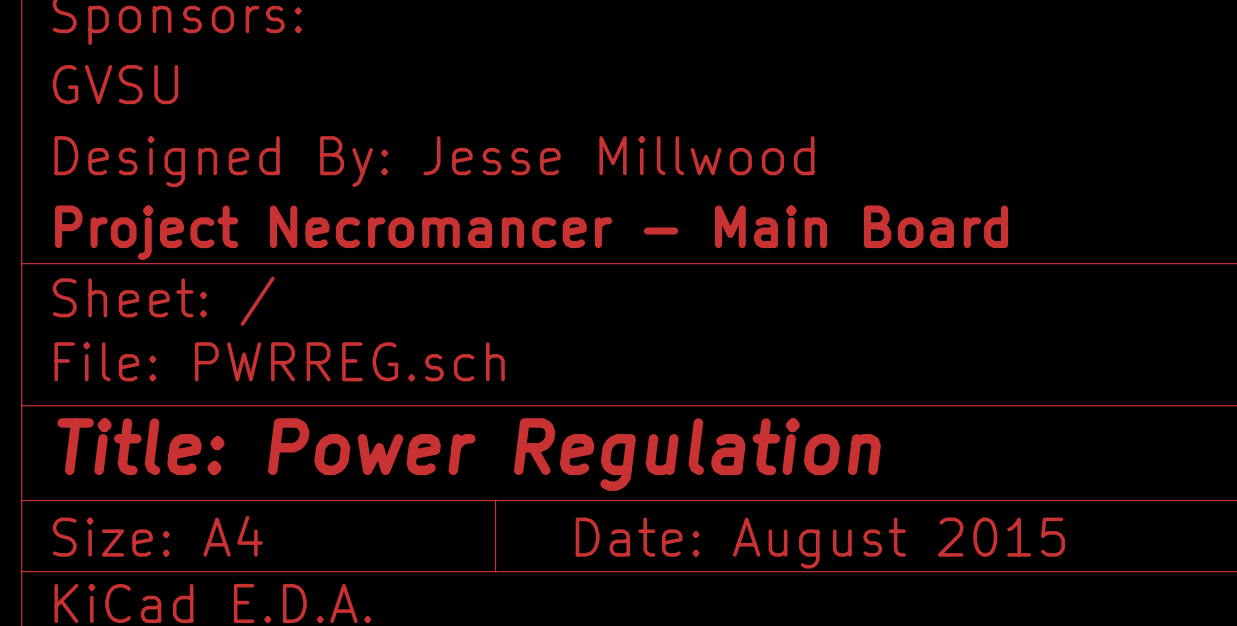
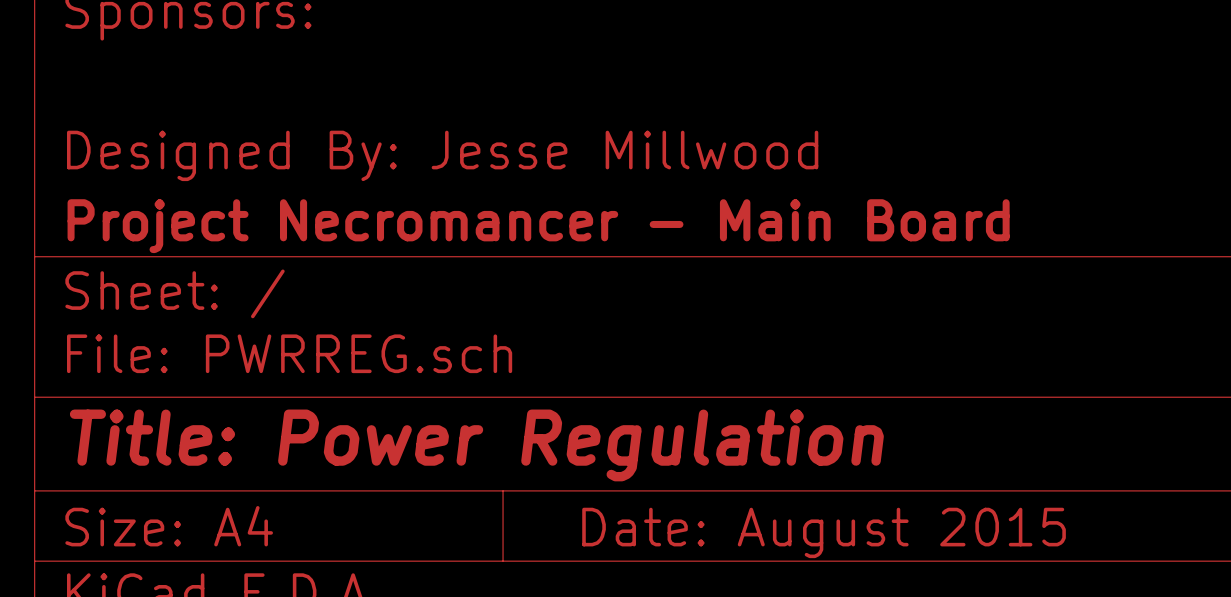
title block: GVSU (115, 84) -> none

